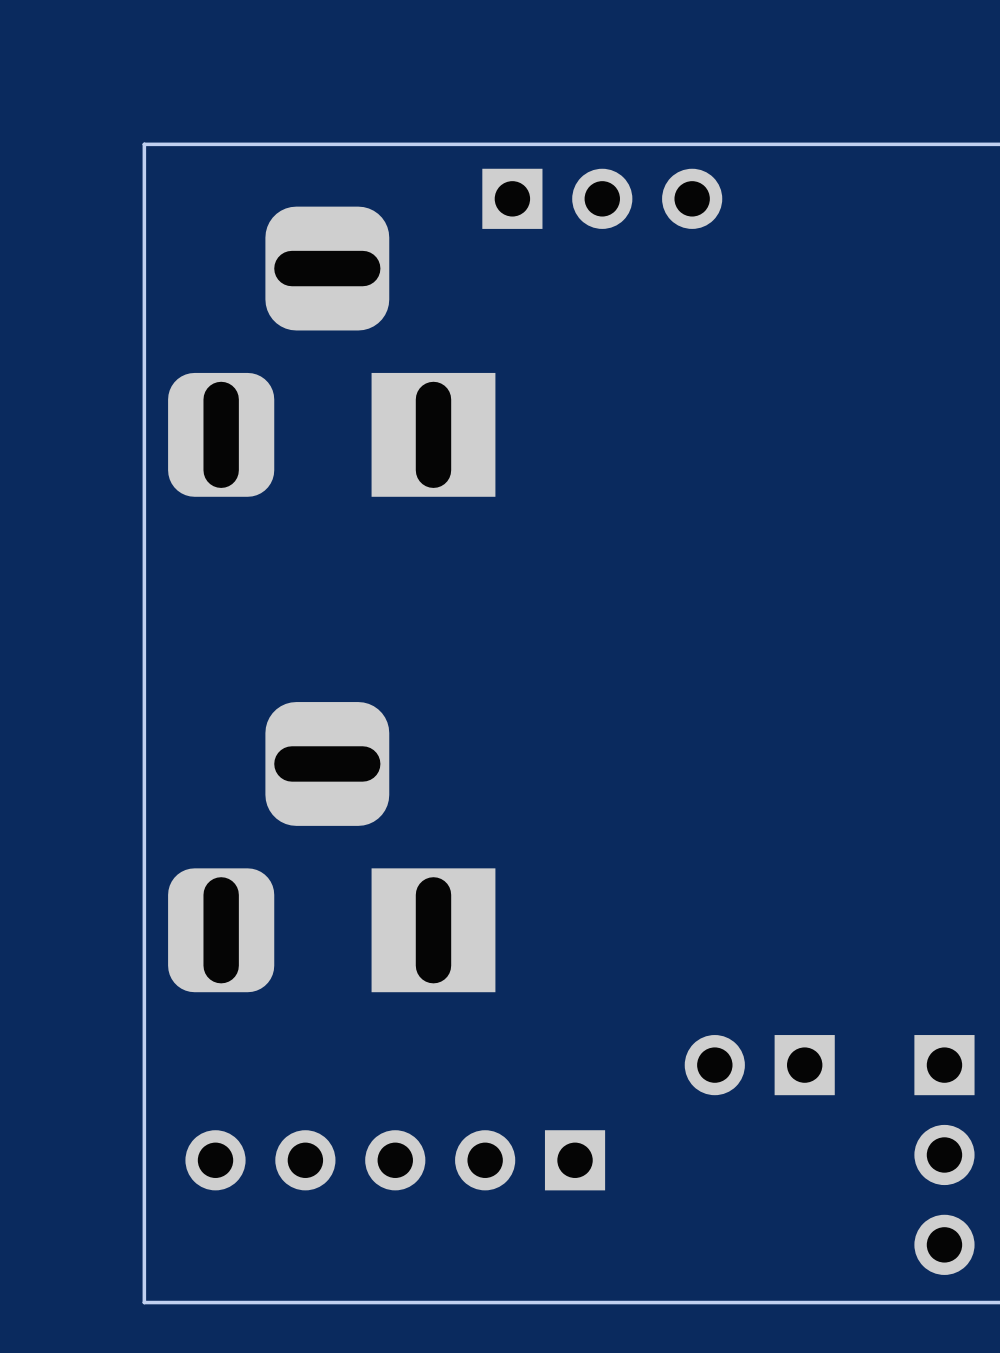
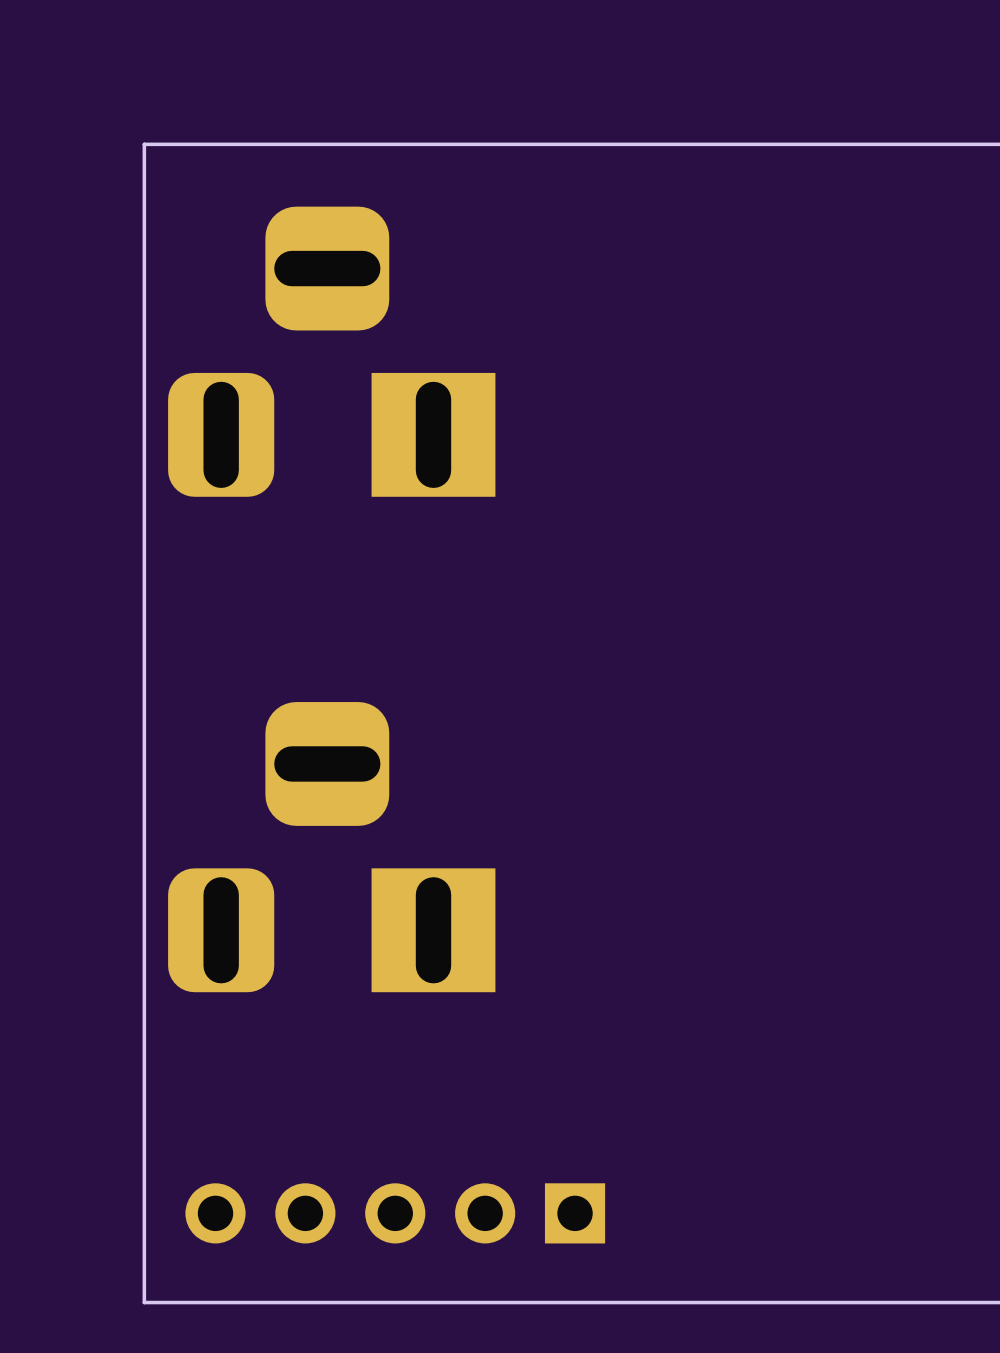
part: (602, 198) -> none
part: (759, 1065) -> none
part: (944, 1154) -> none
part position: (395, 1160) -> (395, 1213)

